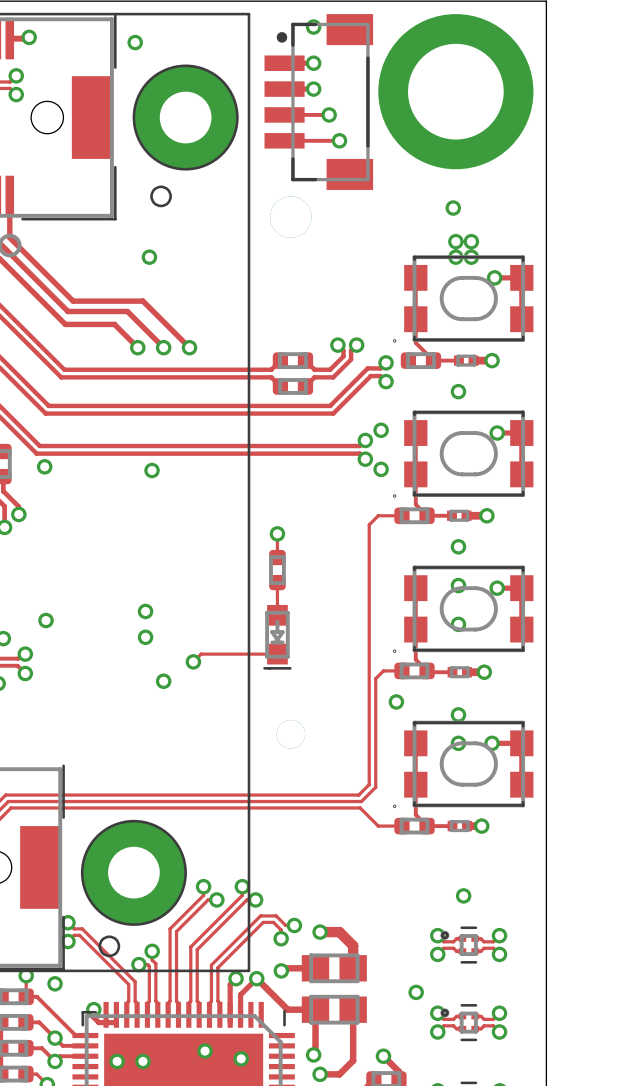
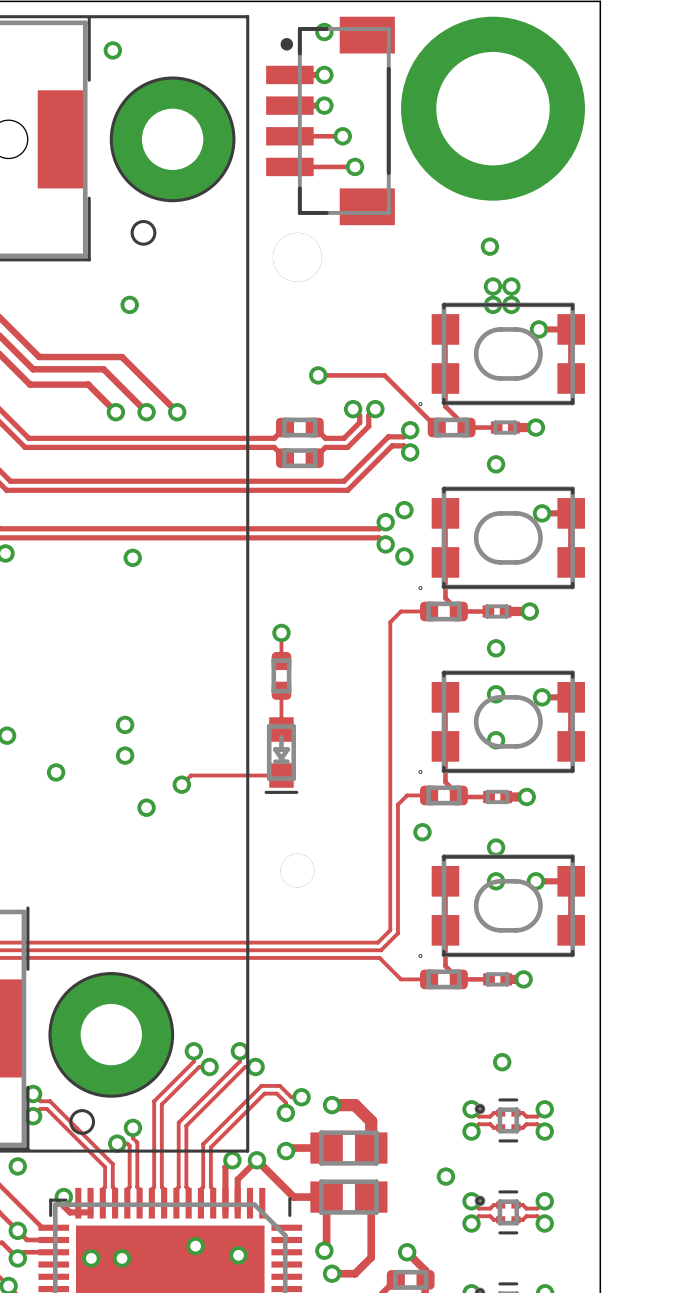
track: none -> (318, 375) (384, 375) (436, 427)
via: none -> (318, 375)
via: none -> (56, 772)

